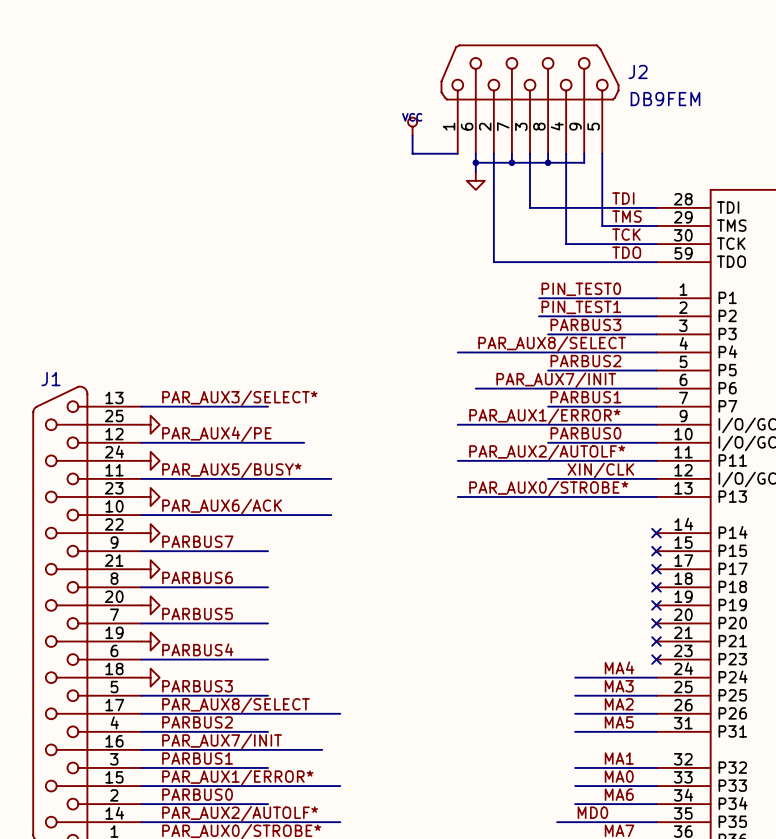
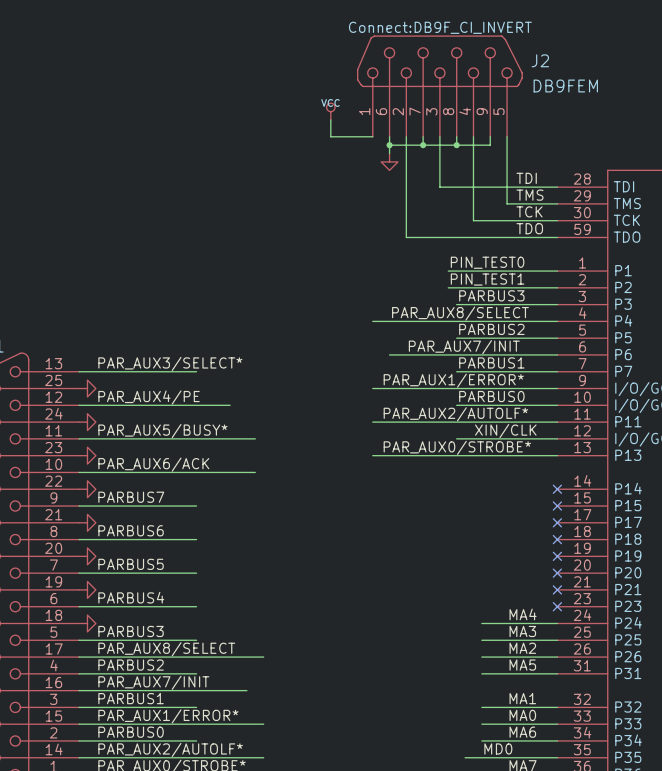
J2 text: none -> Connect:DB9F_CI_INVERT (440, 27)

